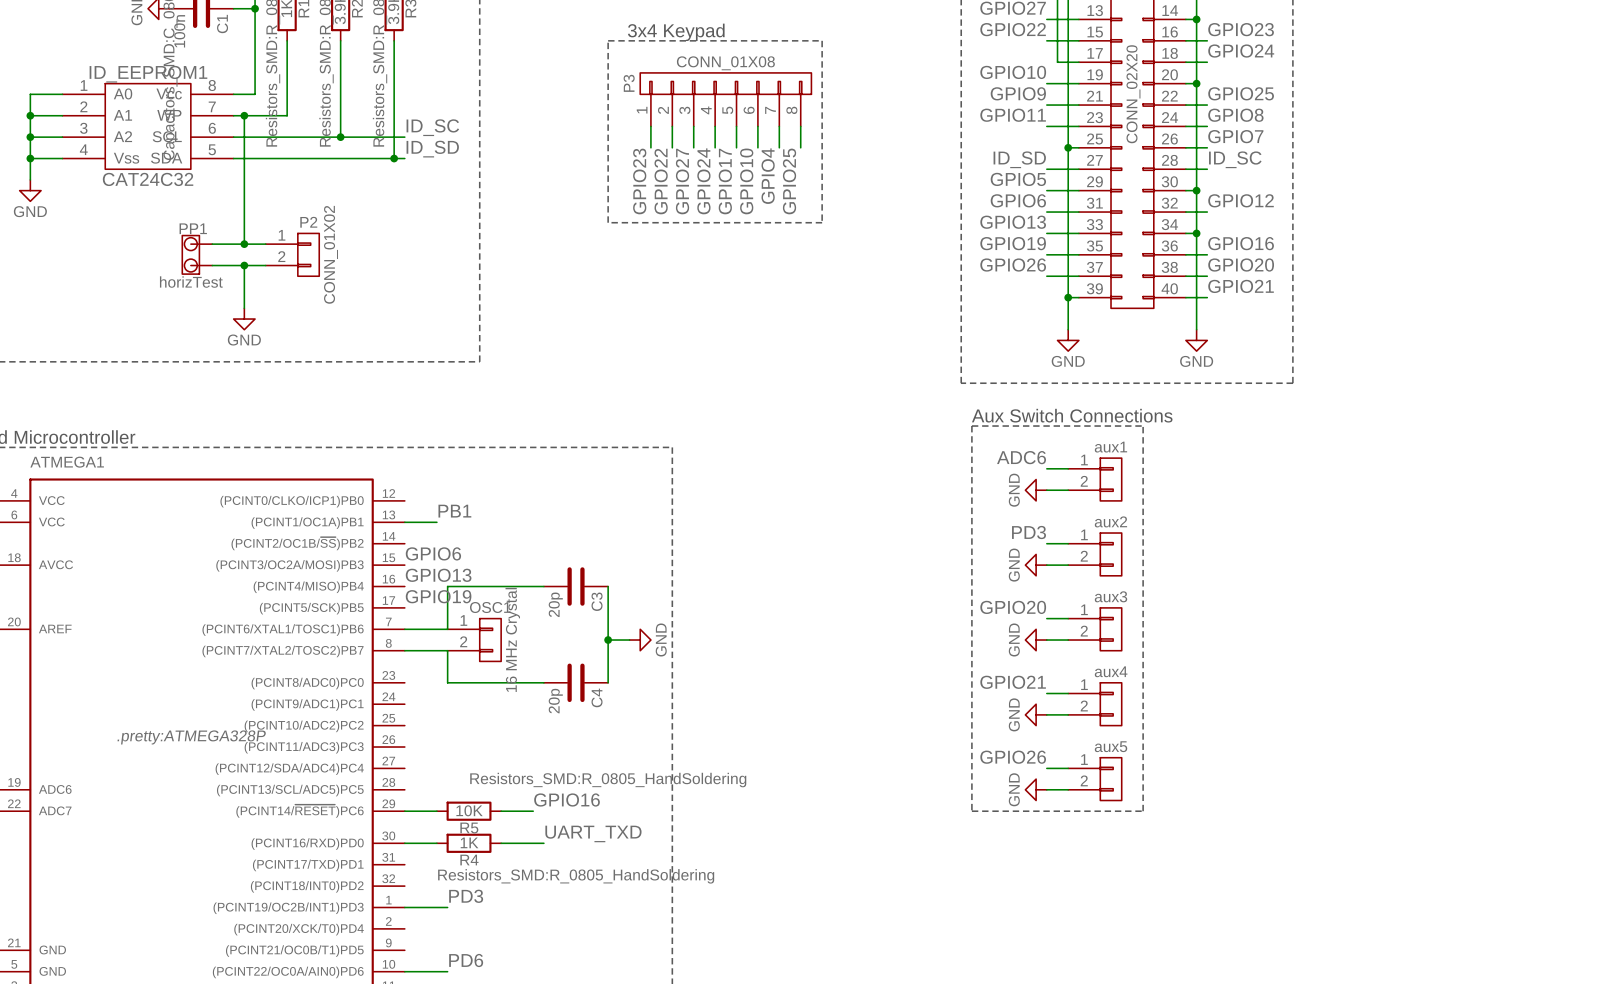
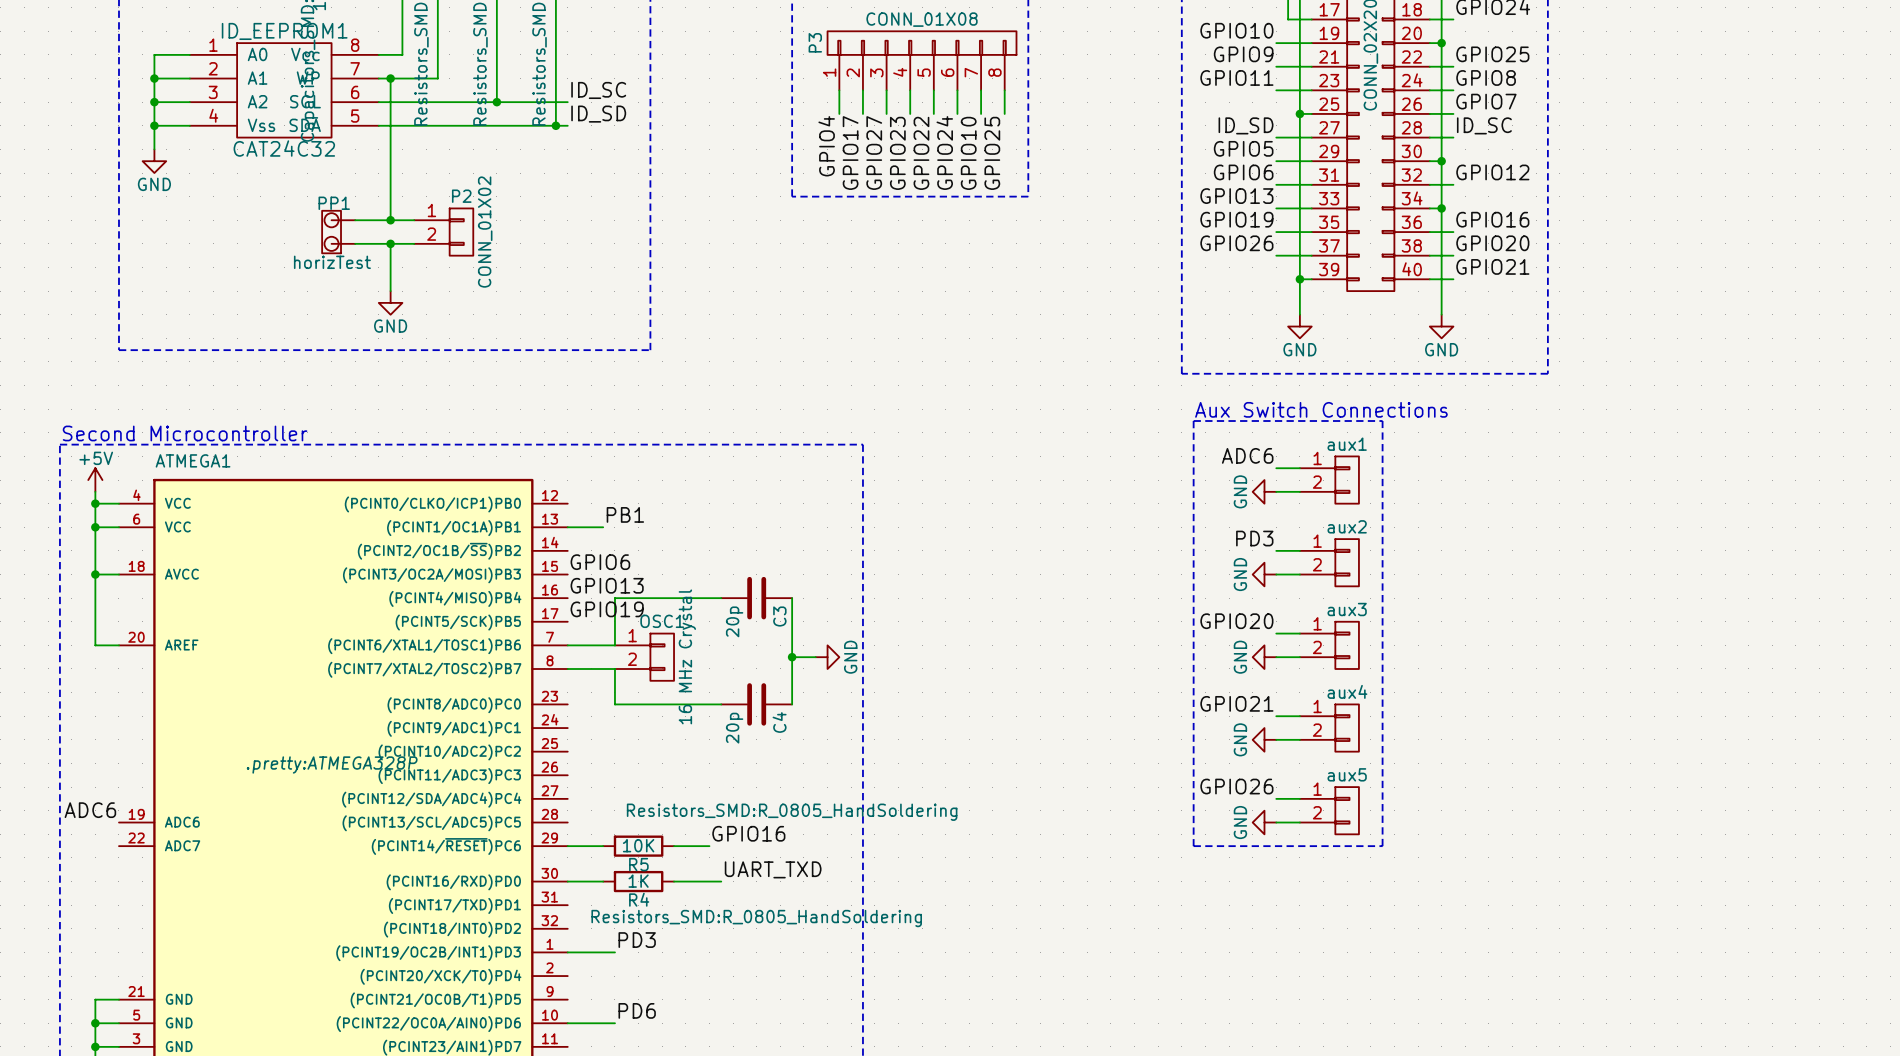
label: GPIO4 (768, 176) -> GPIO10 (968, 153)
label: GPIO23 (639, 181) -> GPIO4 (826, 146)
label: GPIO22 (661, 181) -> GPIO17 (850, 153)
label: GPIO24 (703, 181) -> GPIO23 (897, 153)
label: GPIO17 (725, 181) -> GPIO22 (921, 153)
label: GPIO10 (746, 181) -> GPIO24 (944, 153)

